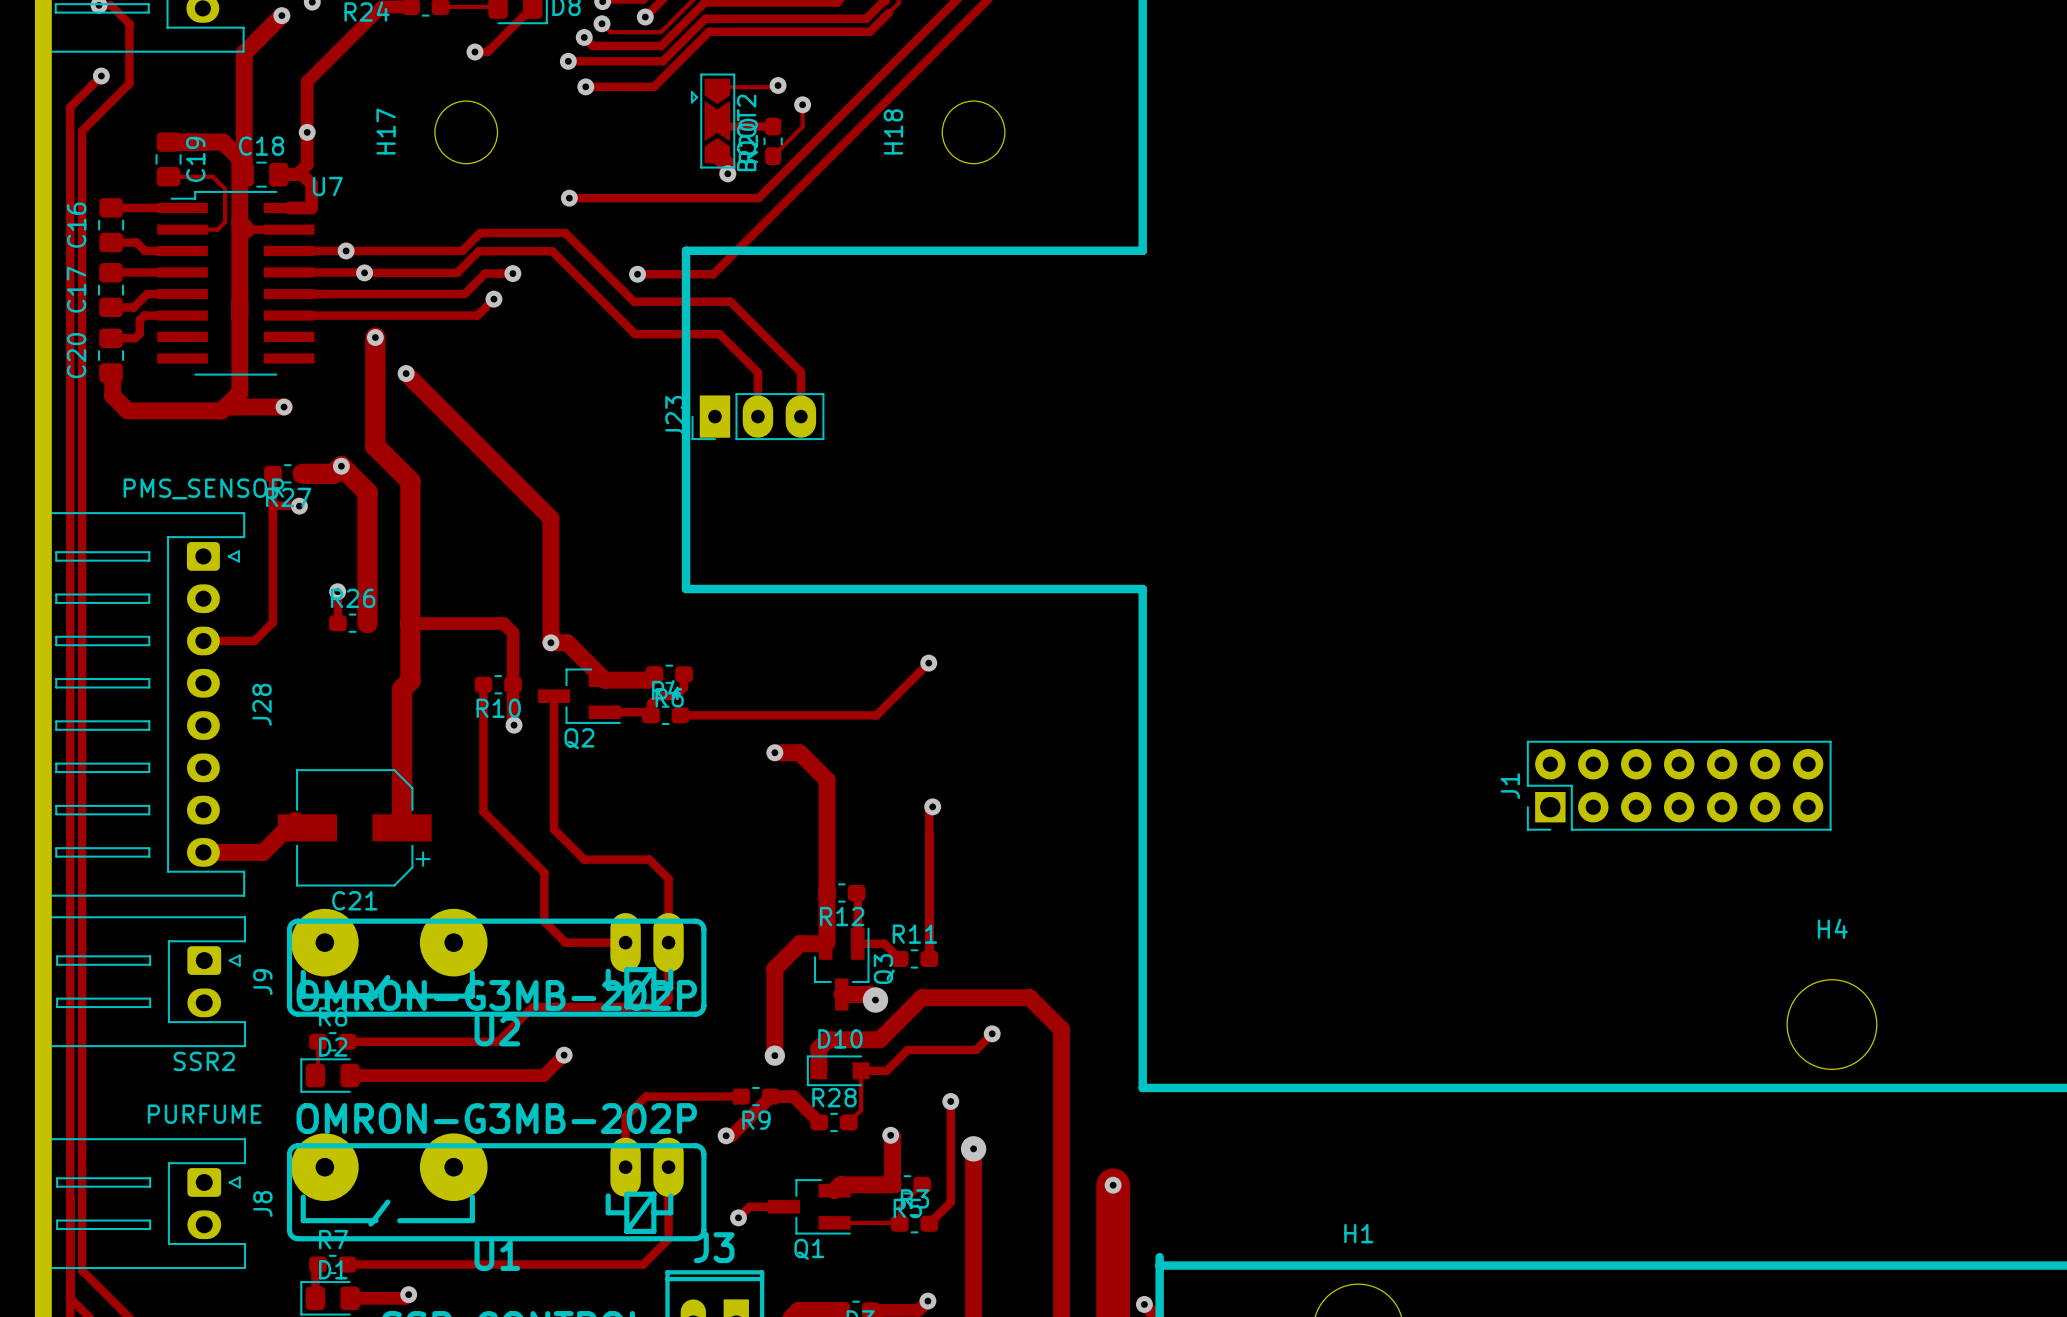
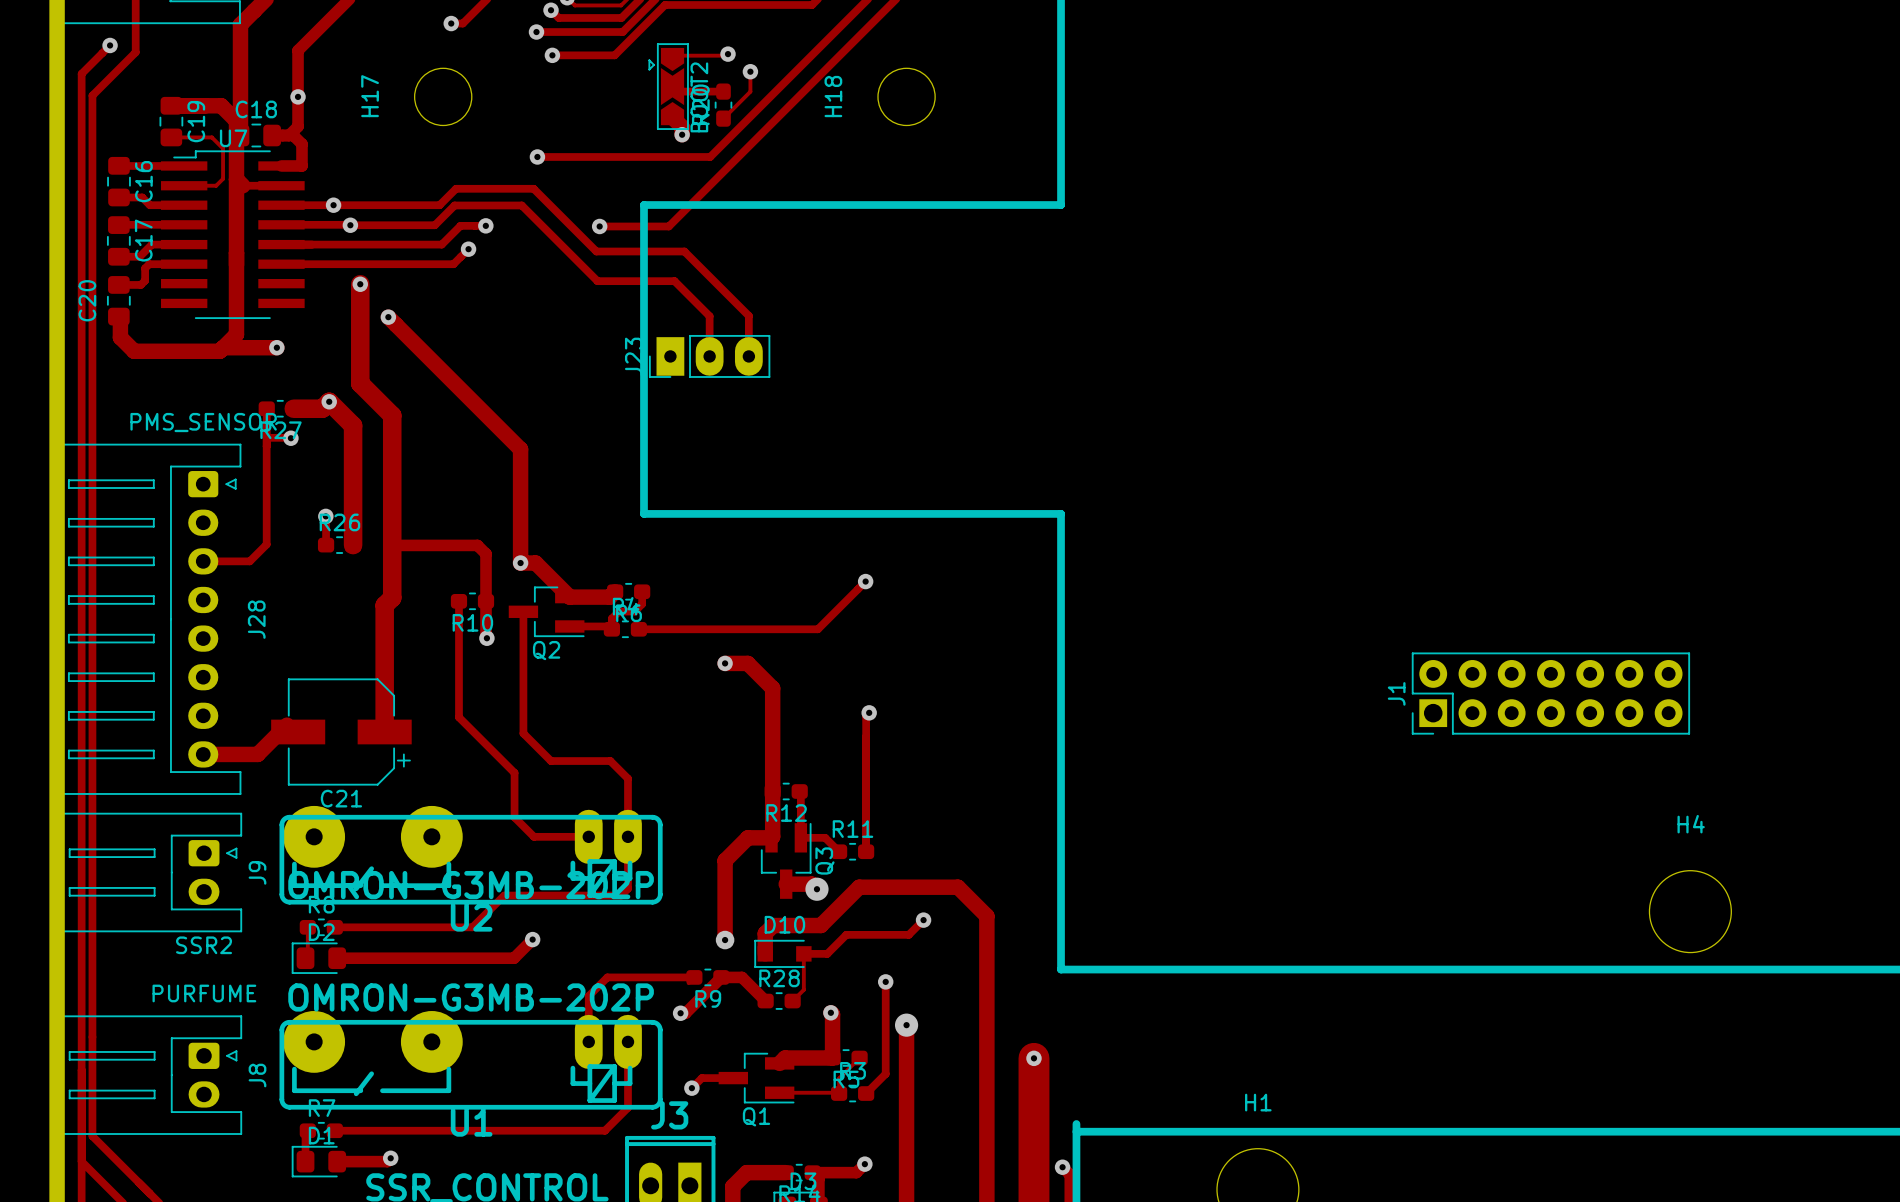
U7 name position: U7 (327, 186) -> U7 (233, 138)
C16 name position: C16 (76, 225) -> C16 (143, 181)
C17 name position: C17 (76, 289) -> C17 (143, 240)

